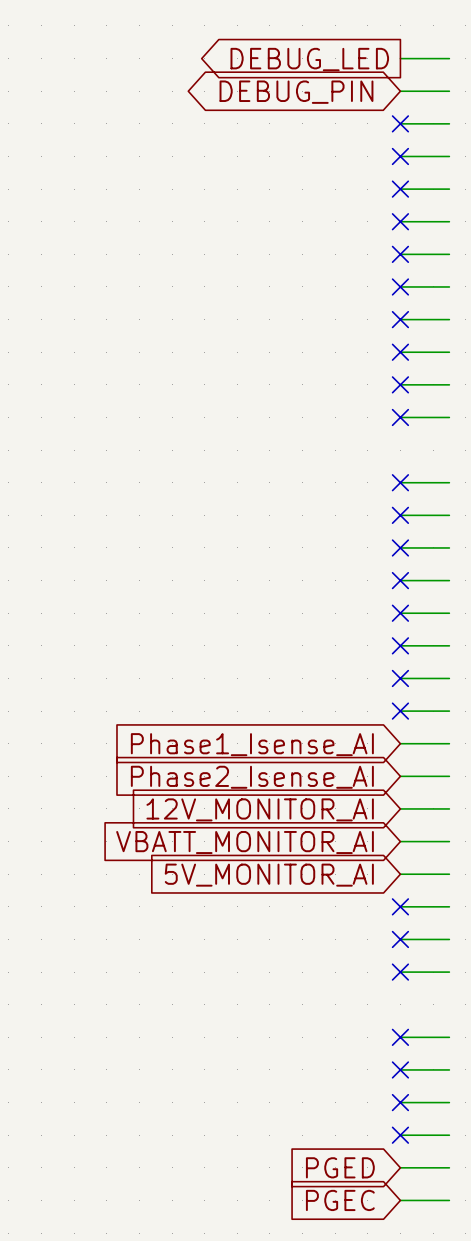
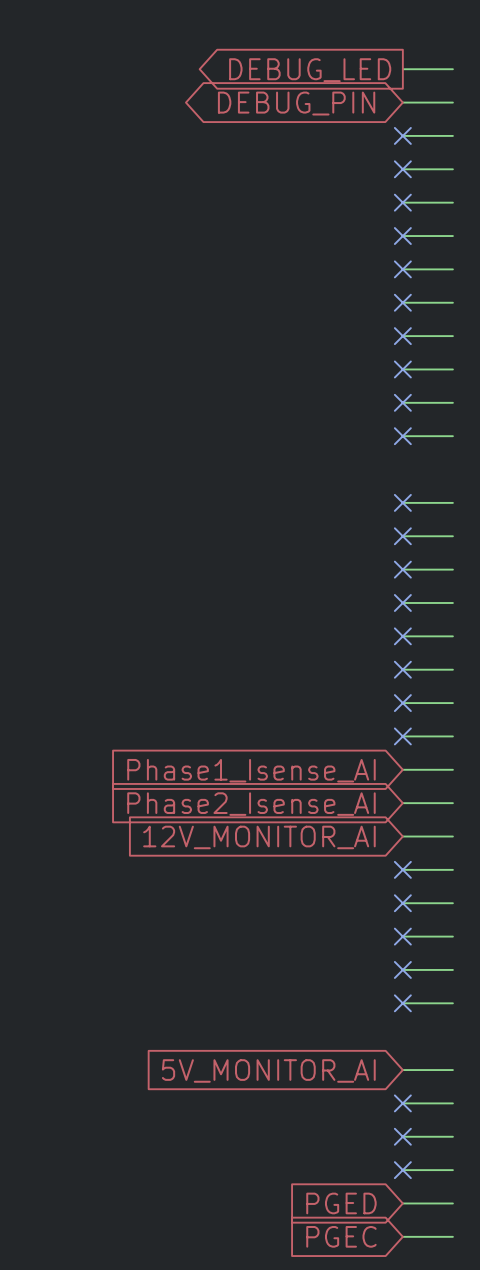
no-connect mark: none -> (402, 869)
global label: VBATT_MONITOR_AI (245, 842) -> none
no-connect mark: none -> (402, 903)
global label position: 5V_MONITOR_AI (269, 875) -> 5V_MONITOR_AI (268, 1070)
no-connect mark: (400, 1037) -> none

